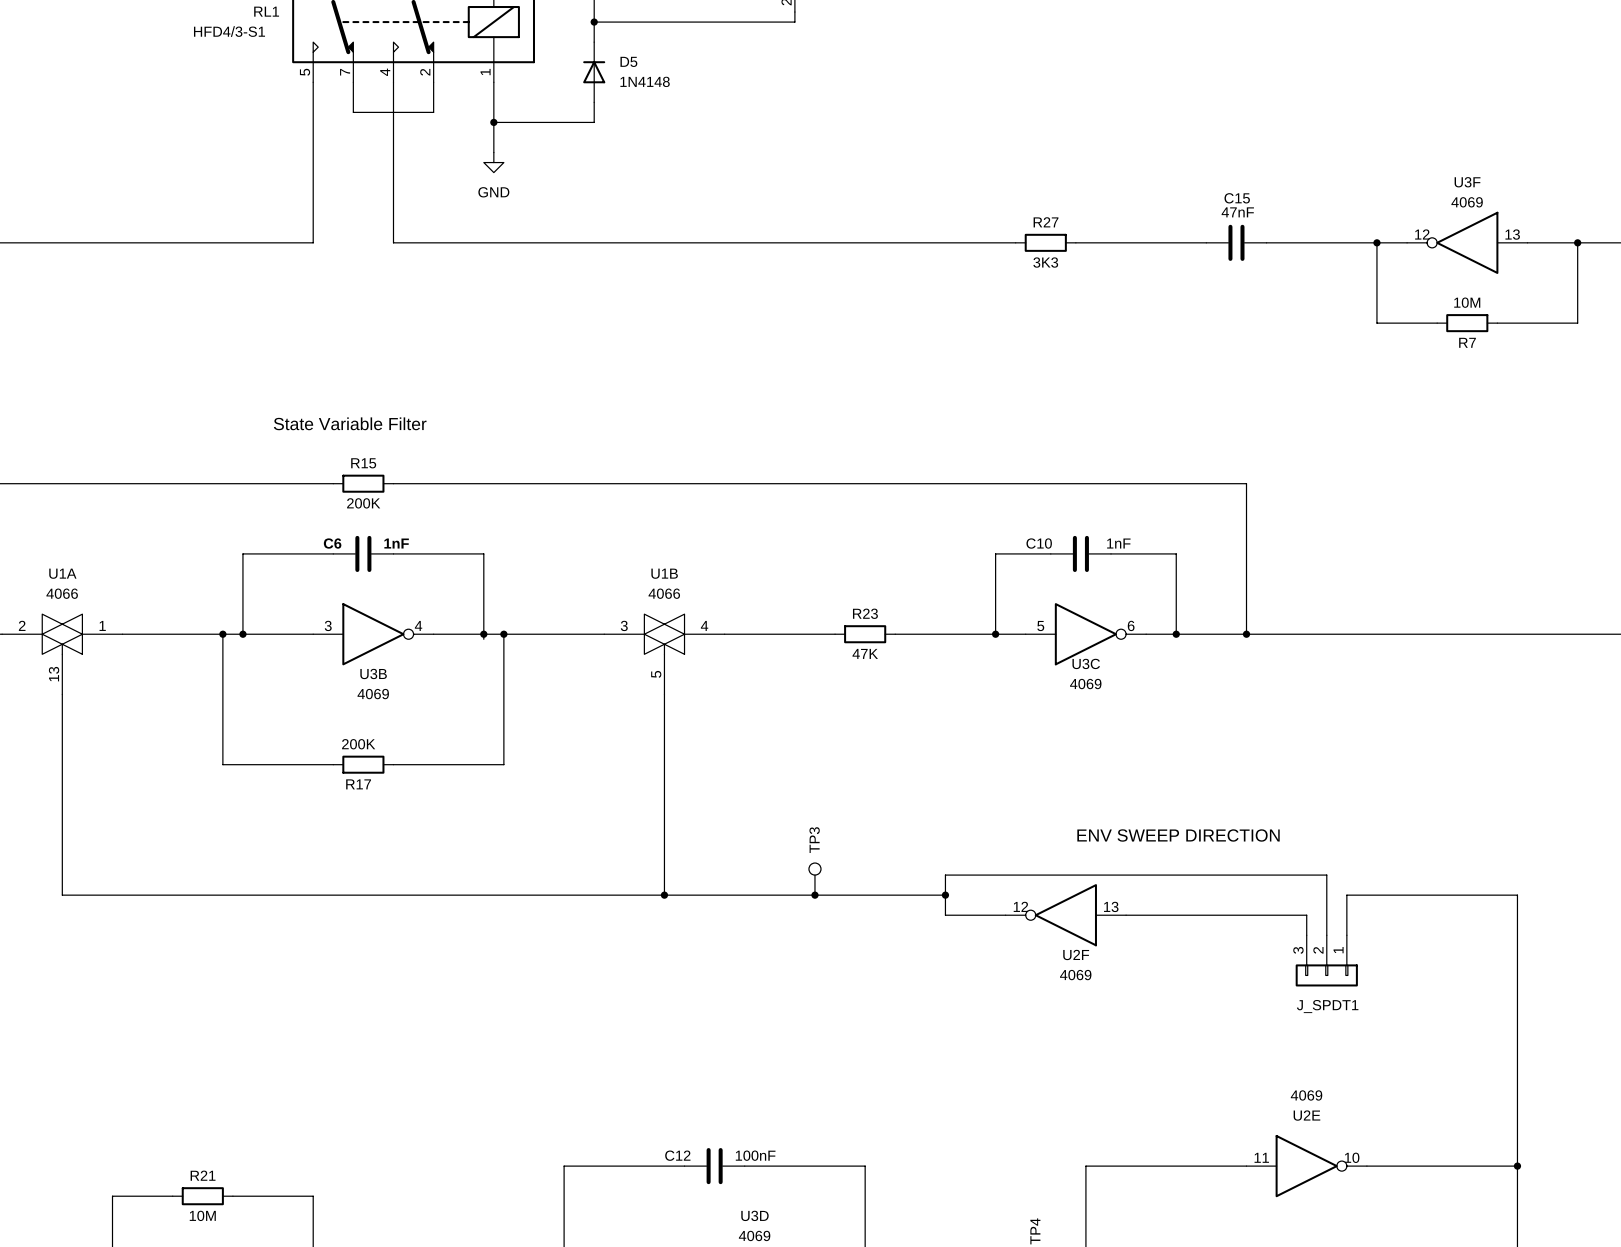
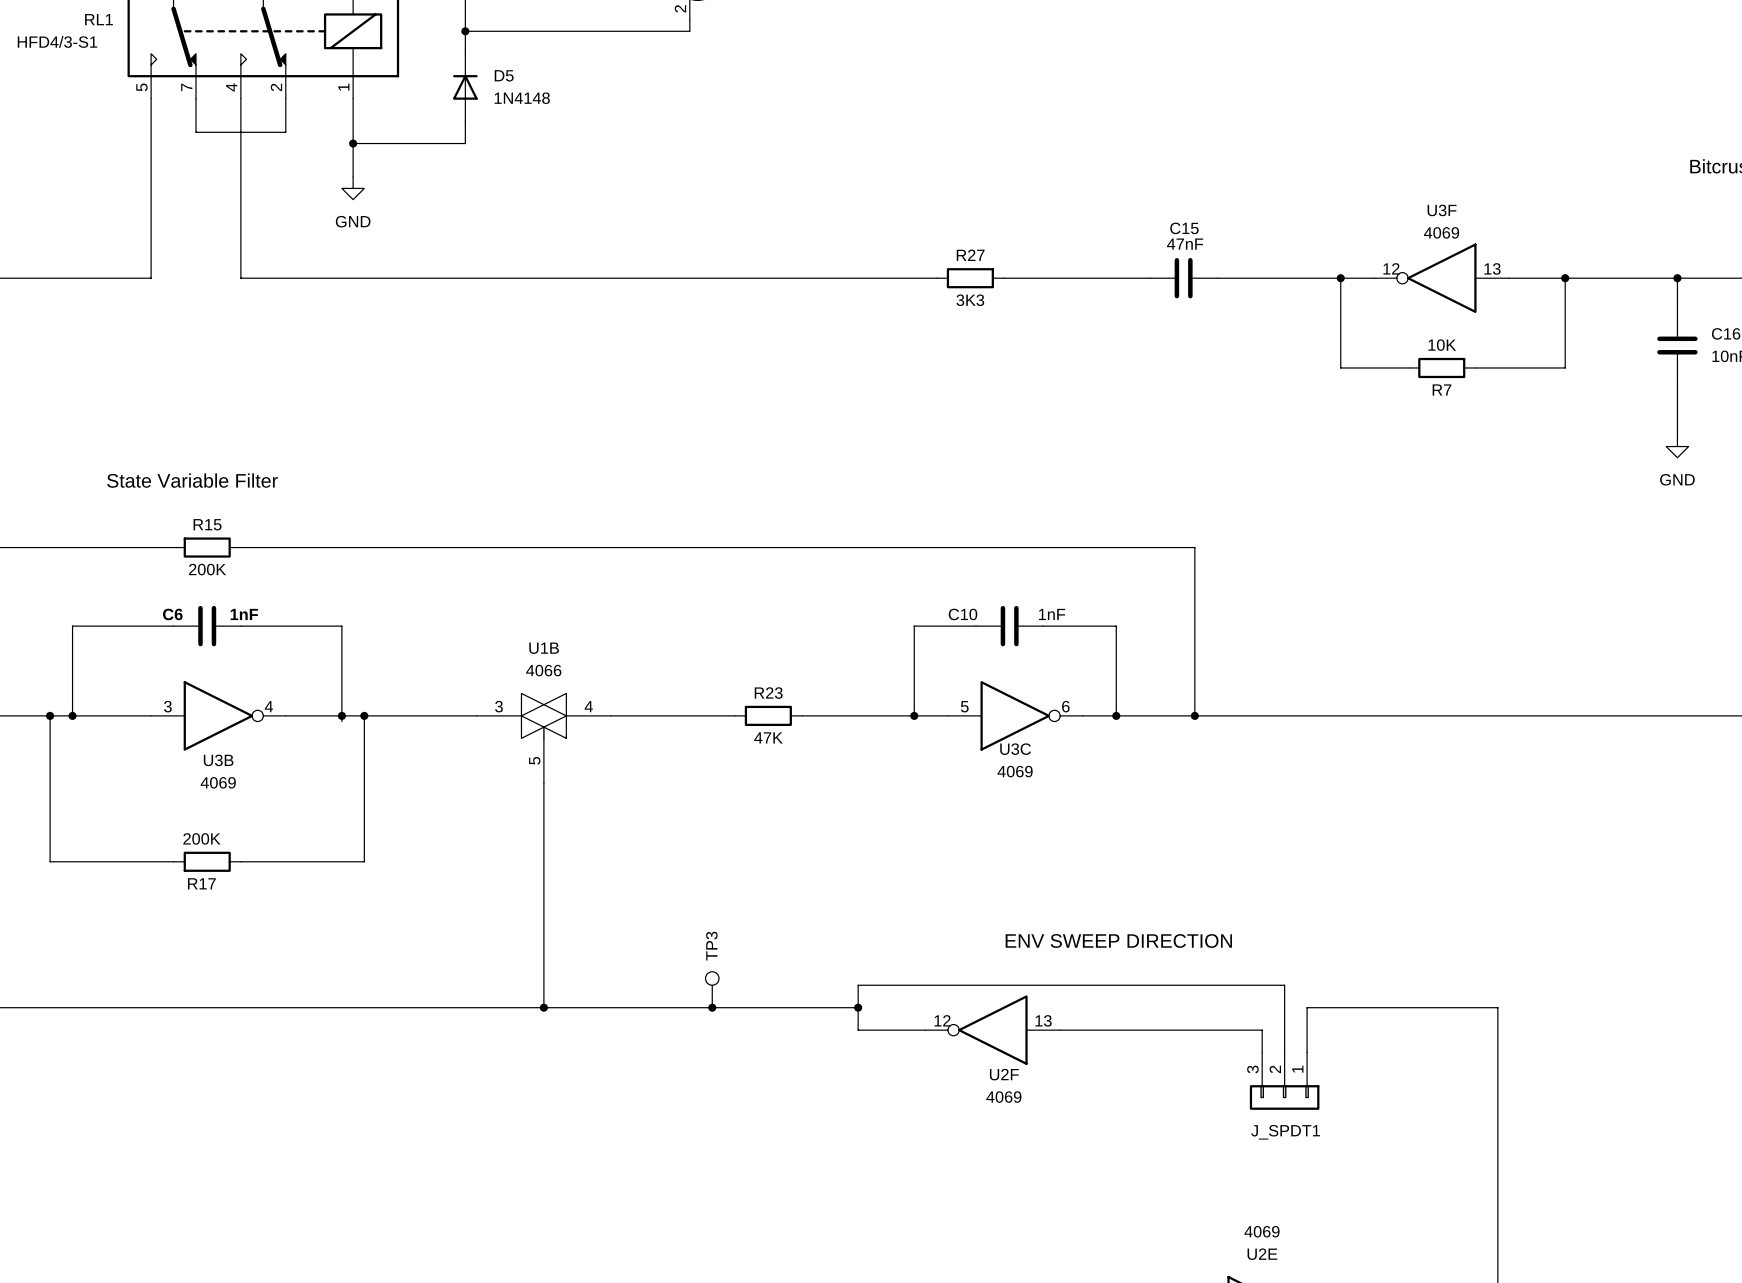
R7 value: 10M (1467, 302) -> 10K (1442, 345)

